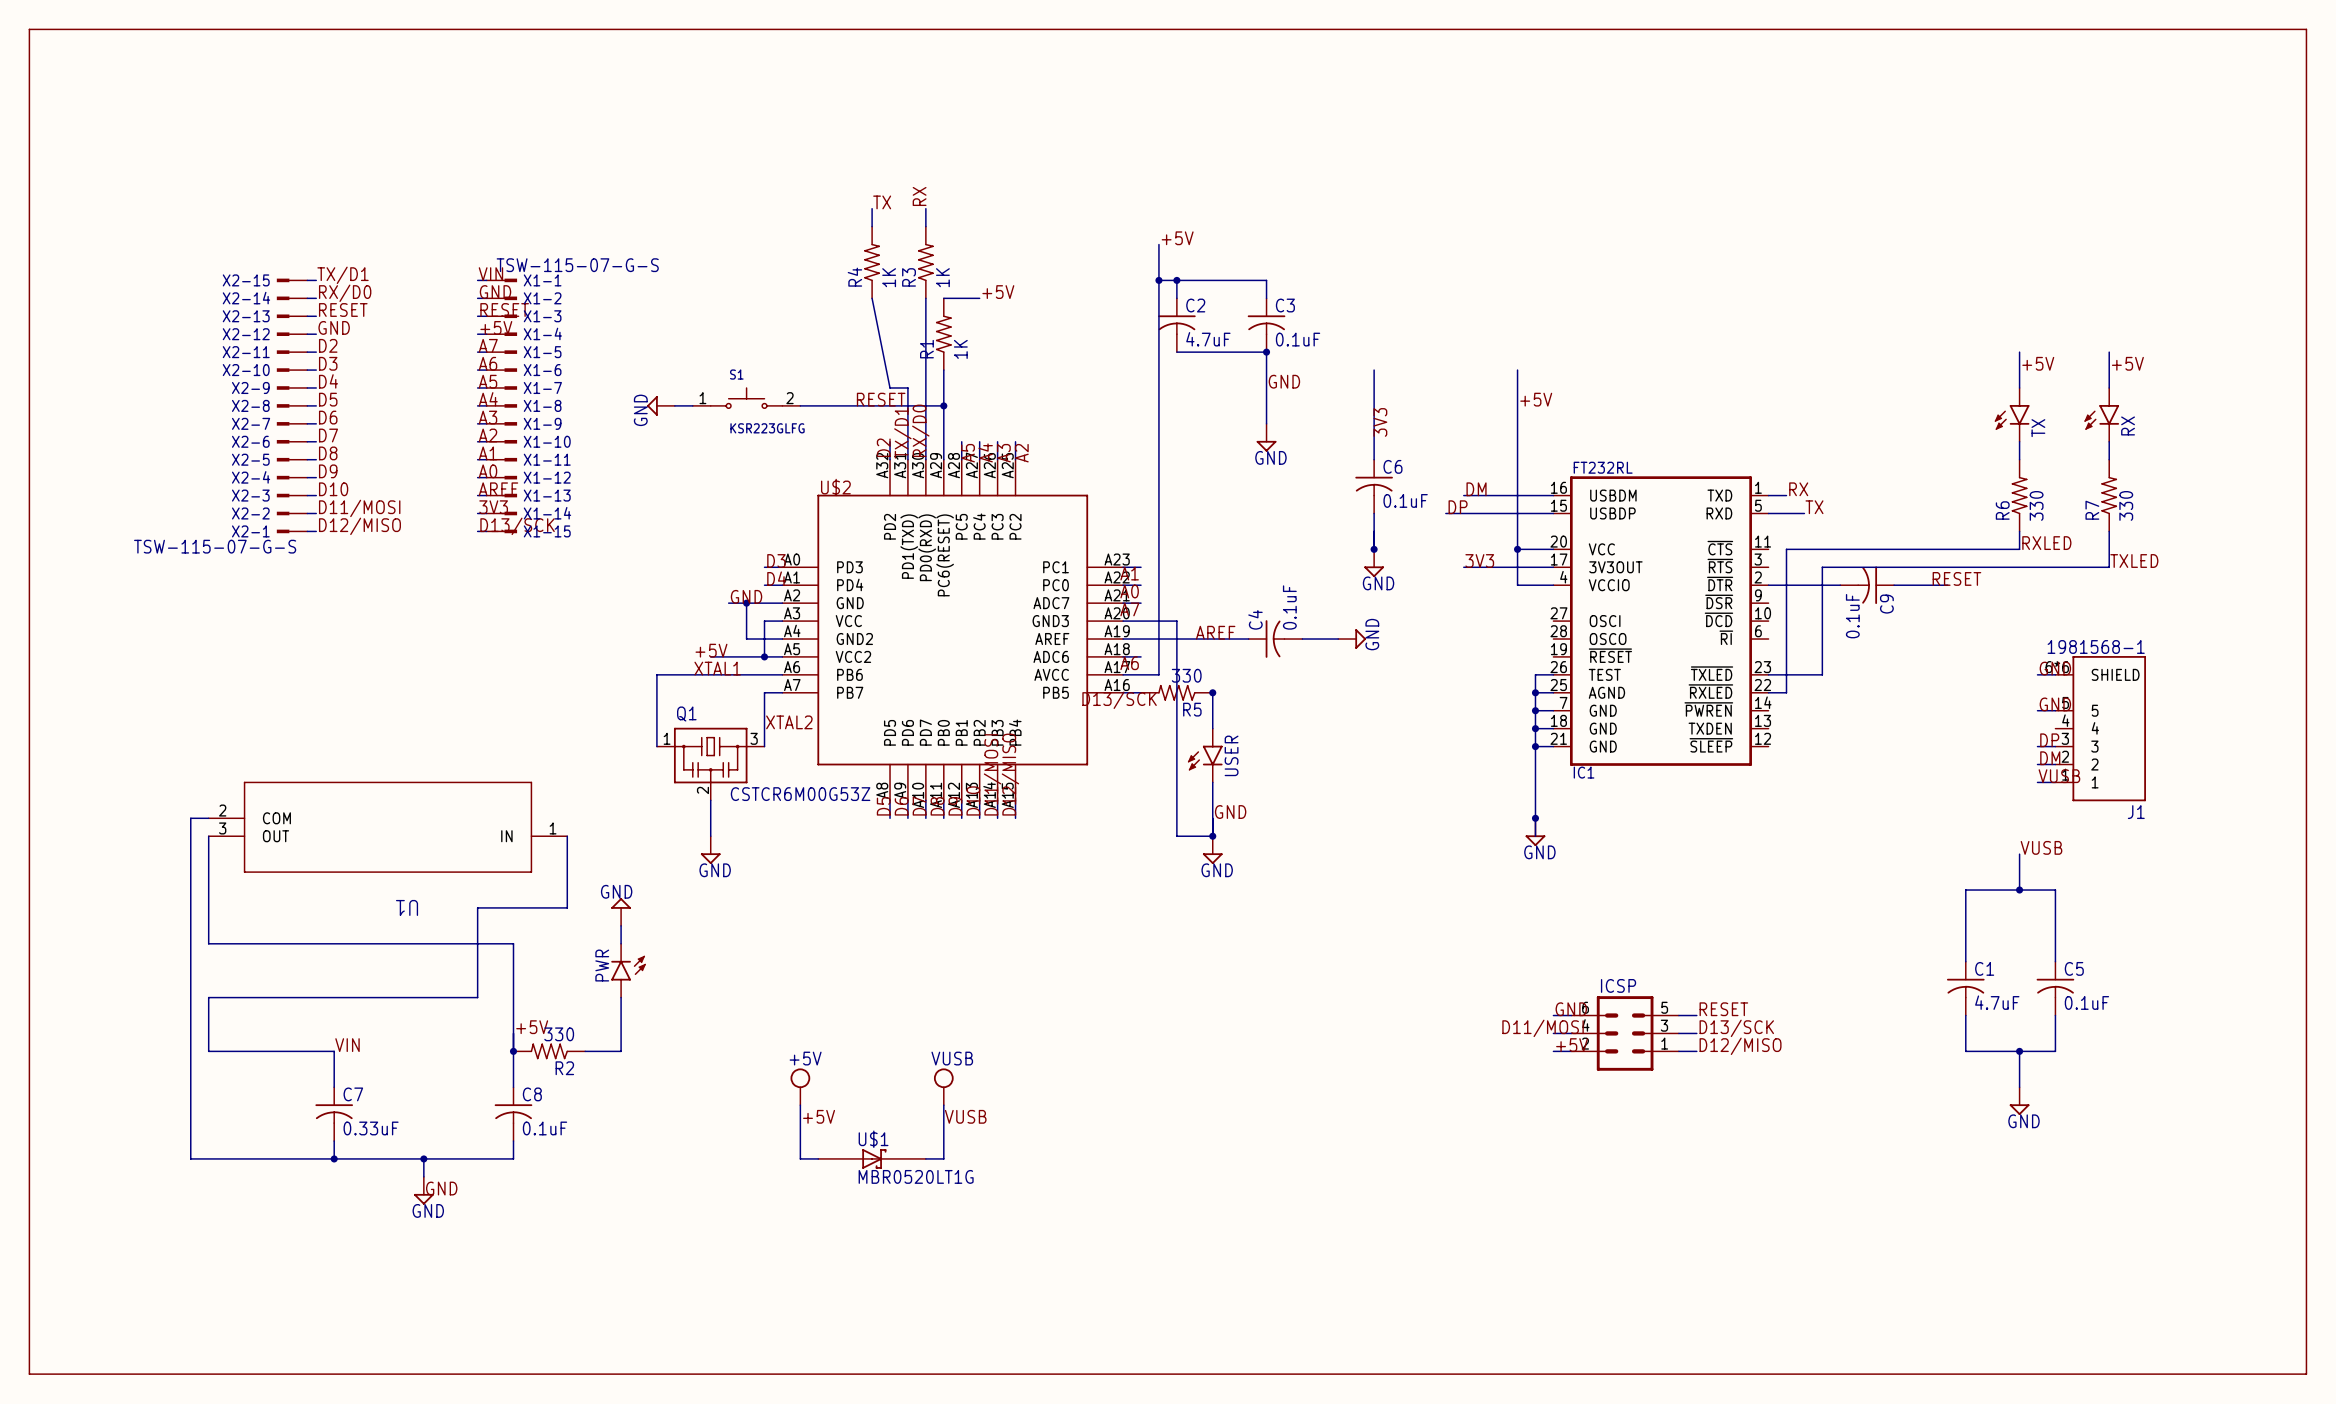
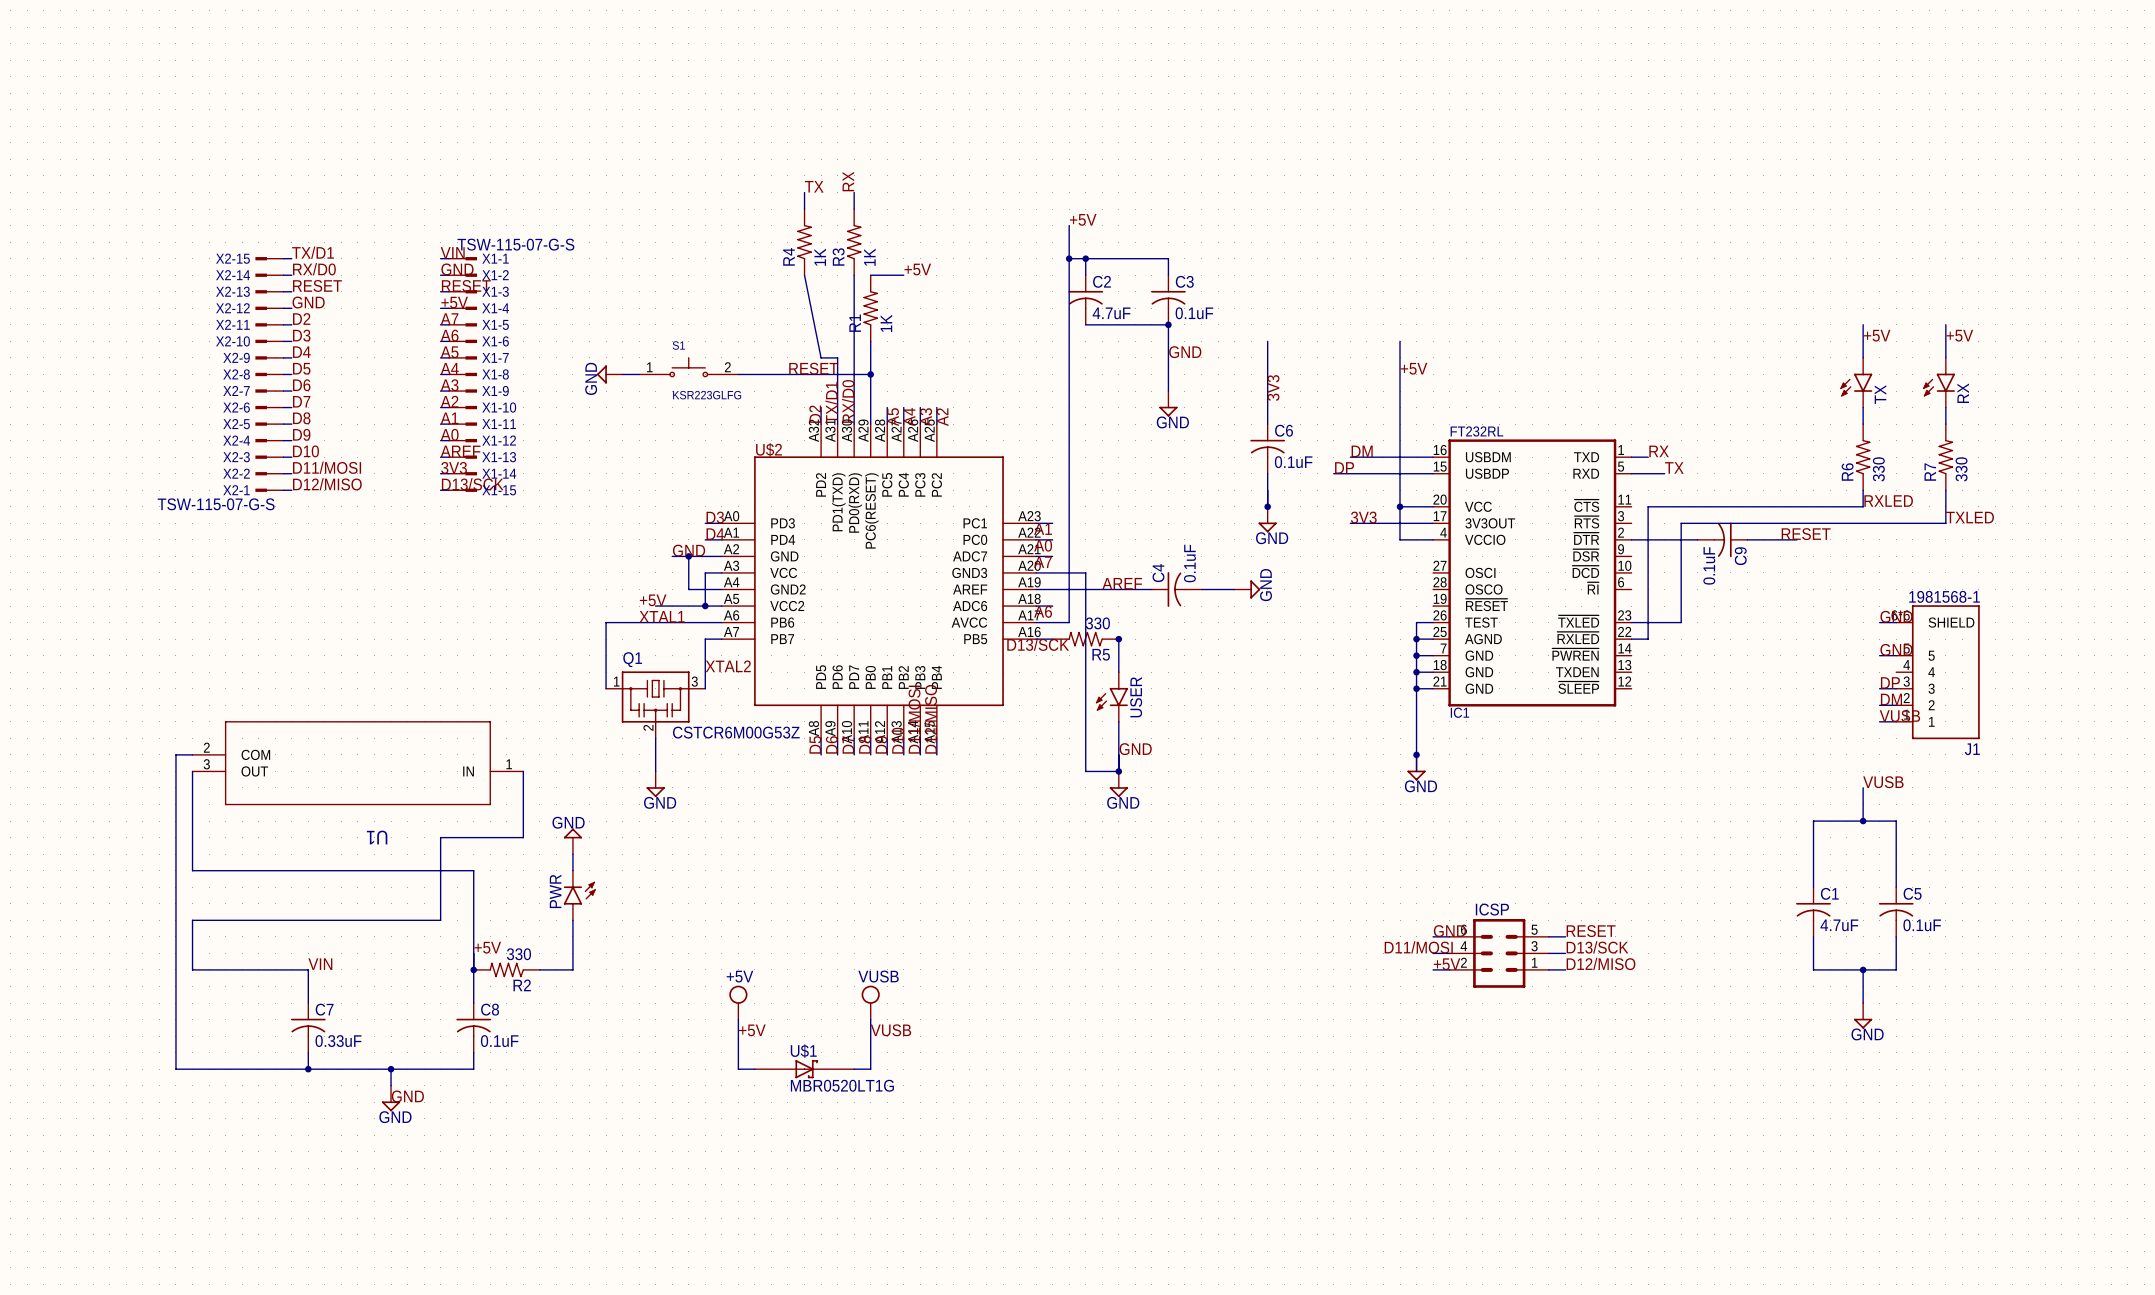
line: (29, 29) (2306, 29) (2306, 1374) (29, 1374) (29, 29) -> none

